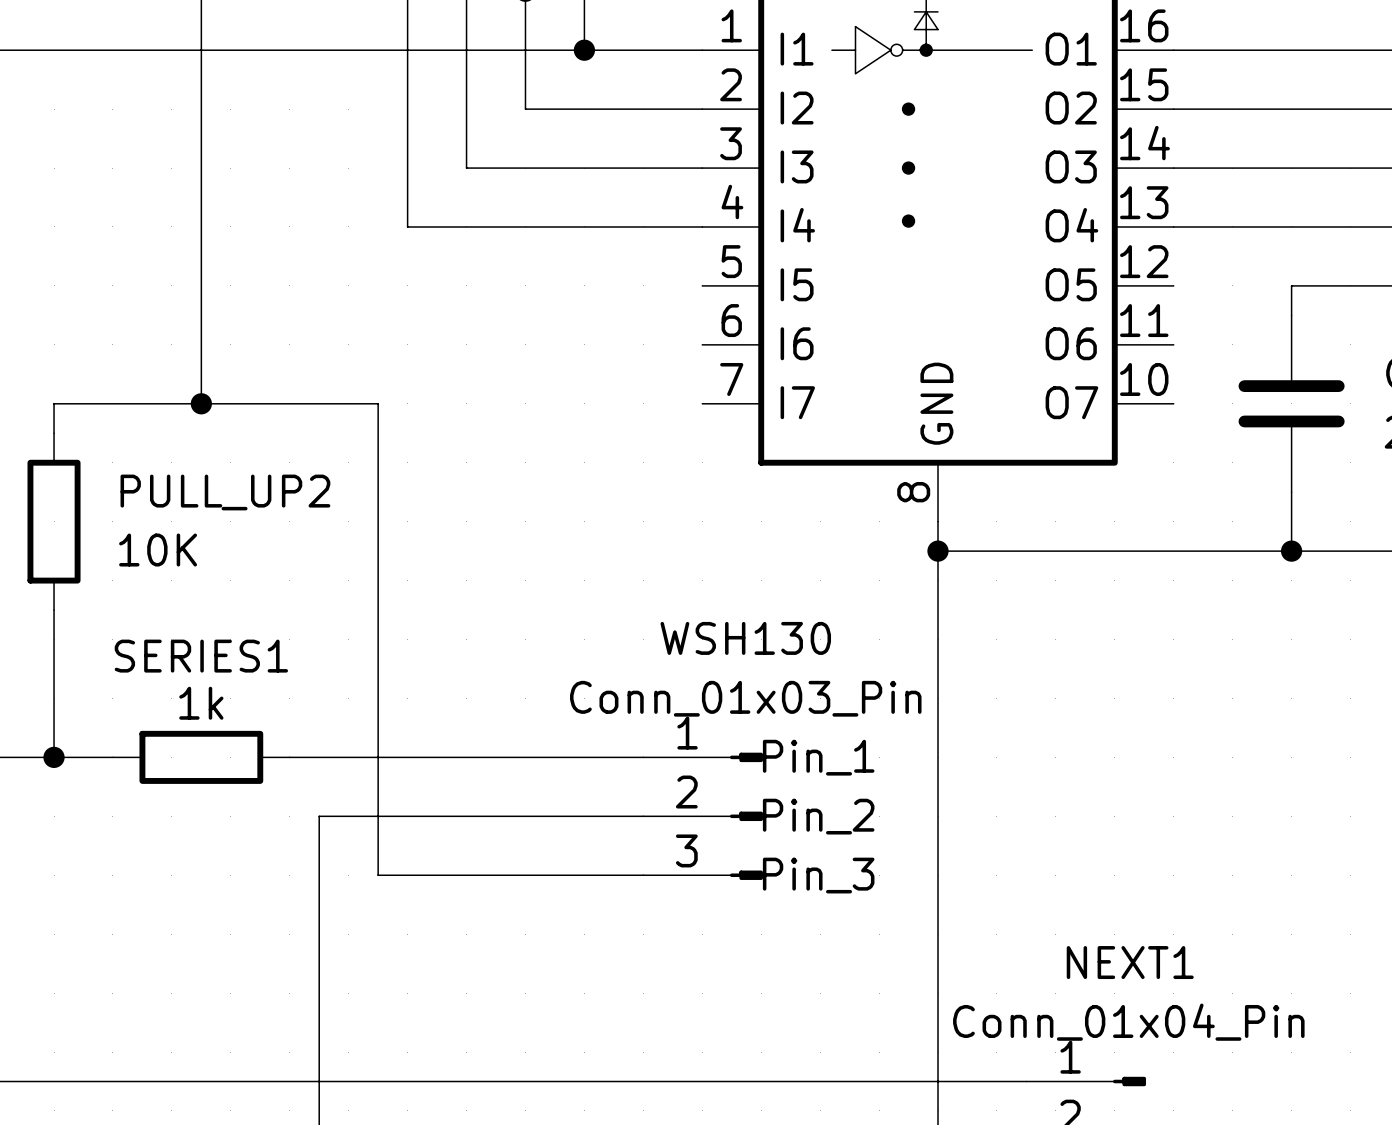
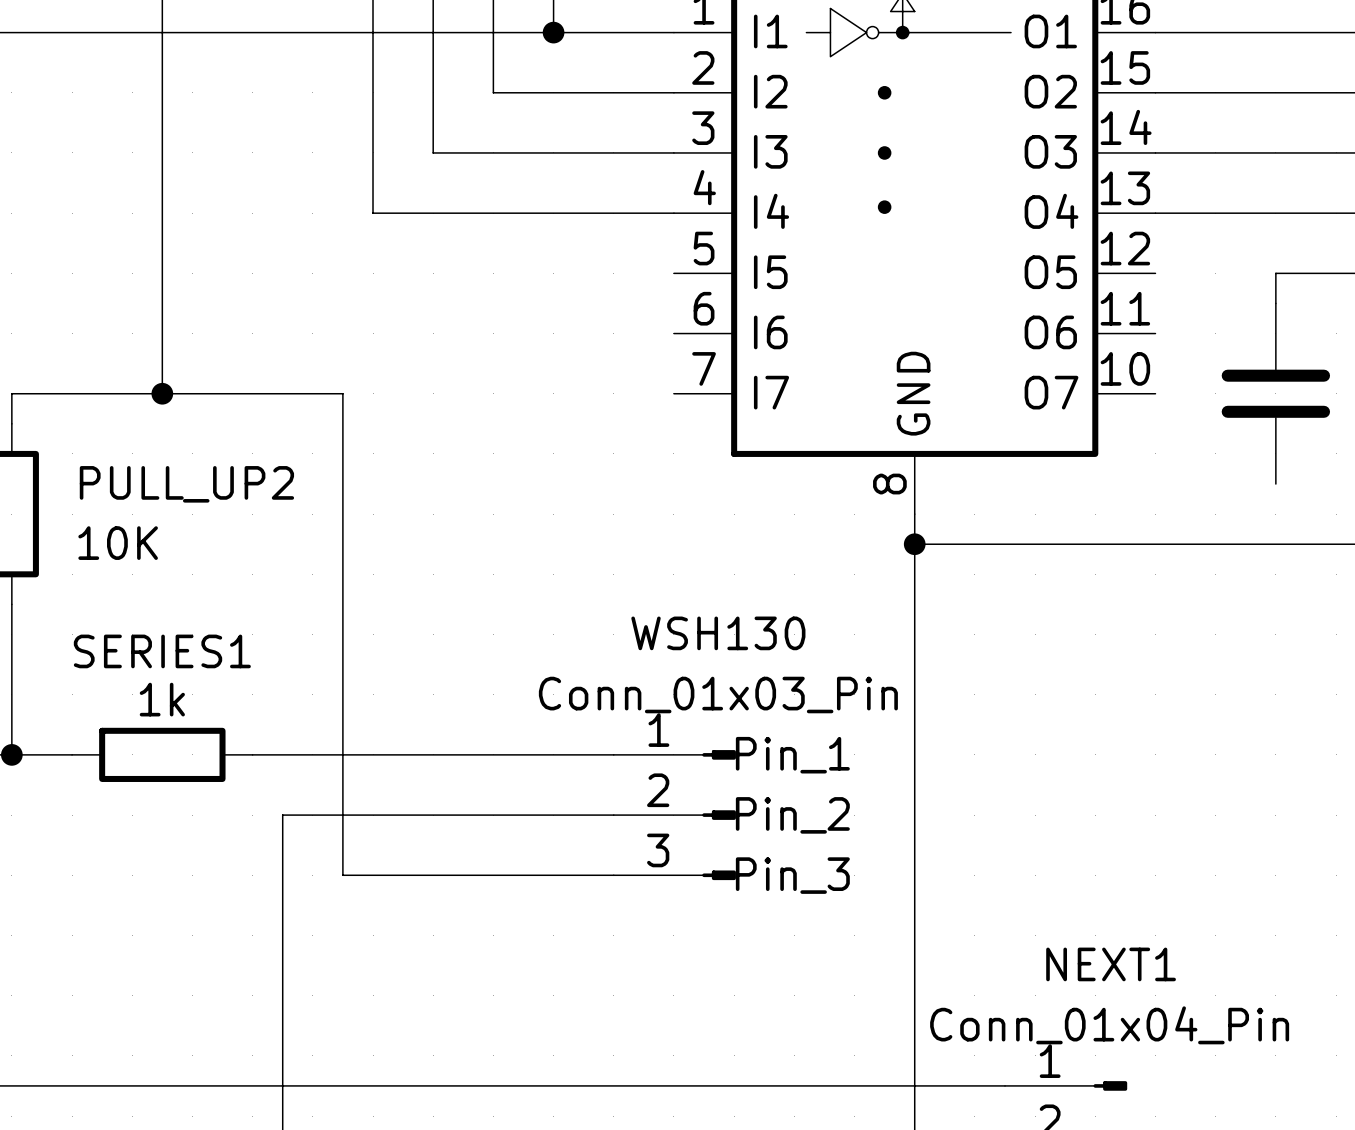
wire: (1291, 492) (1291, 551) -> none
junction: (1291, 551) -> none

